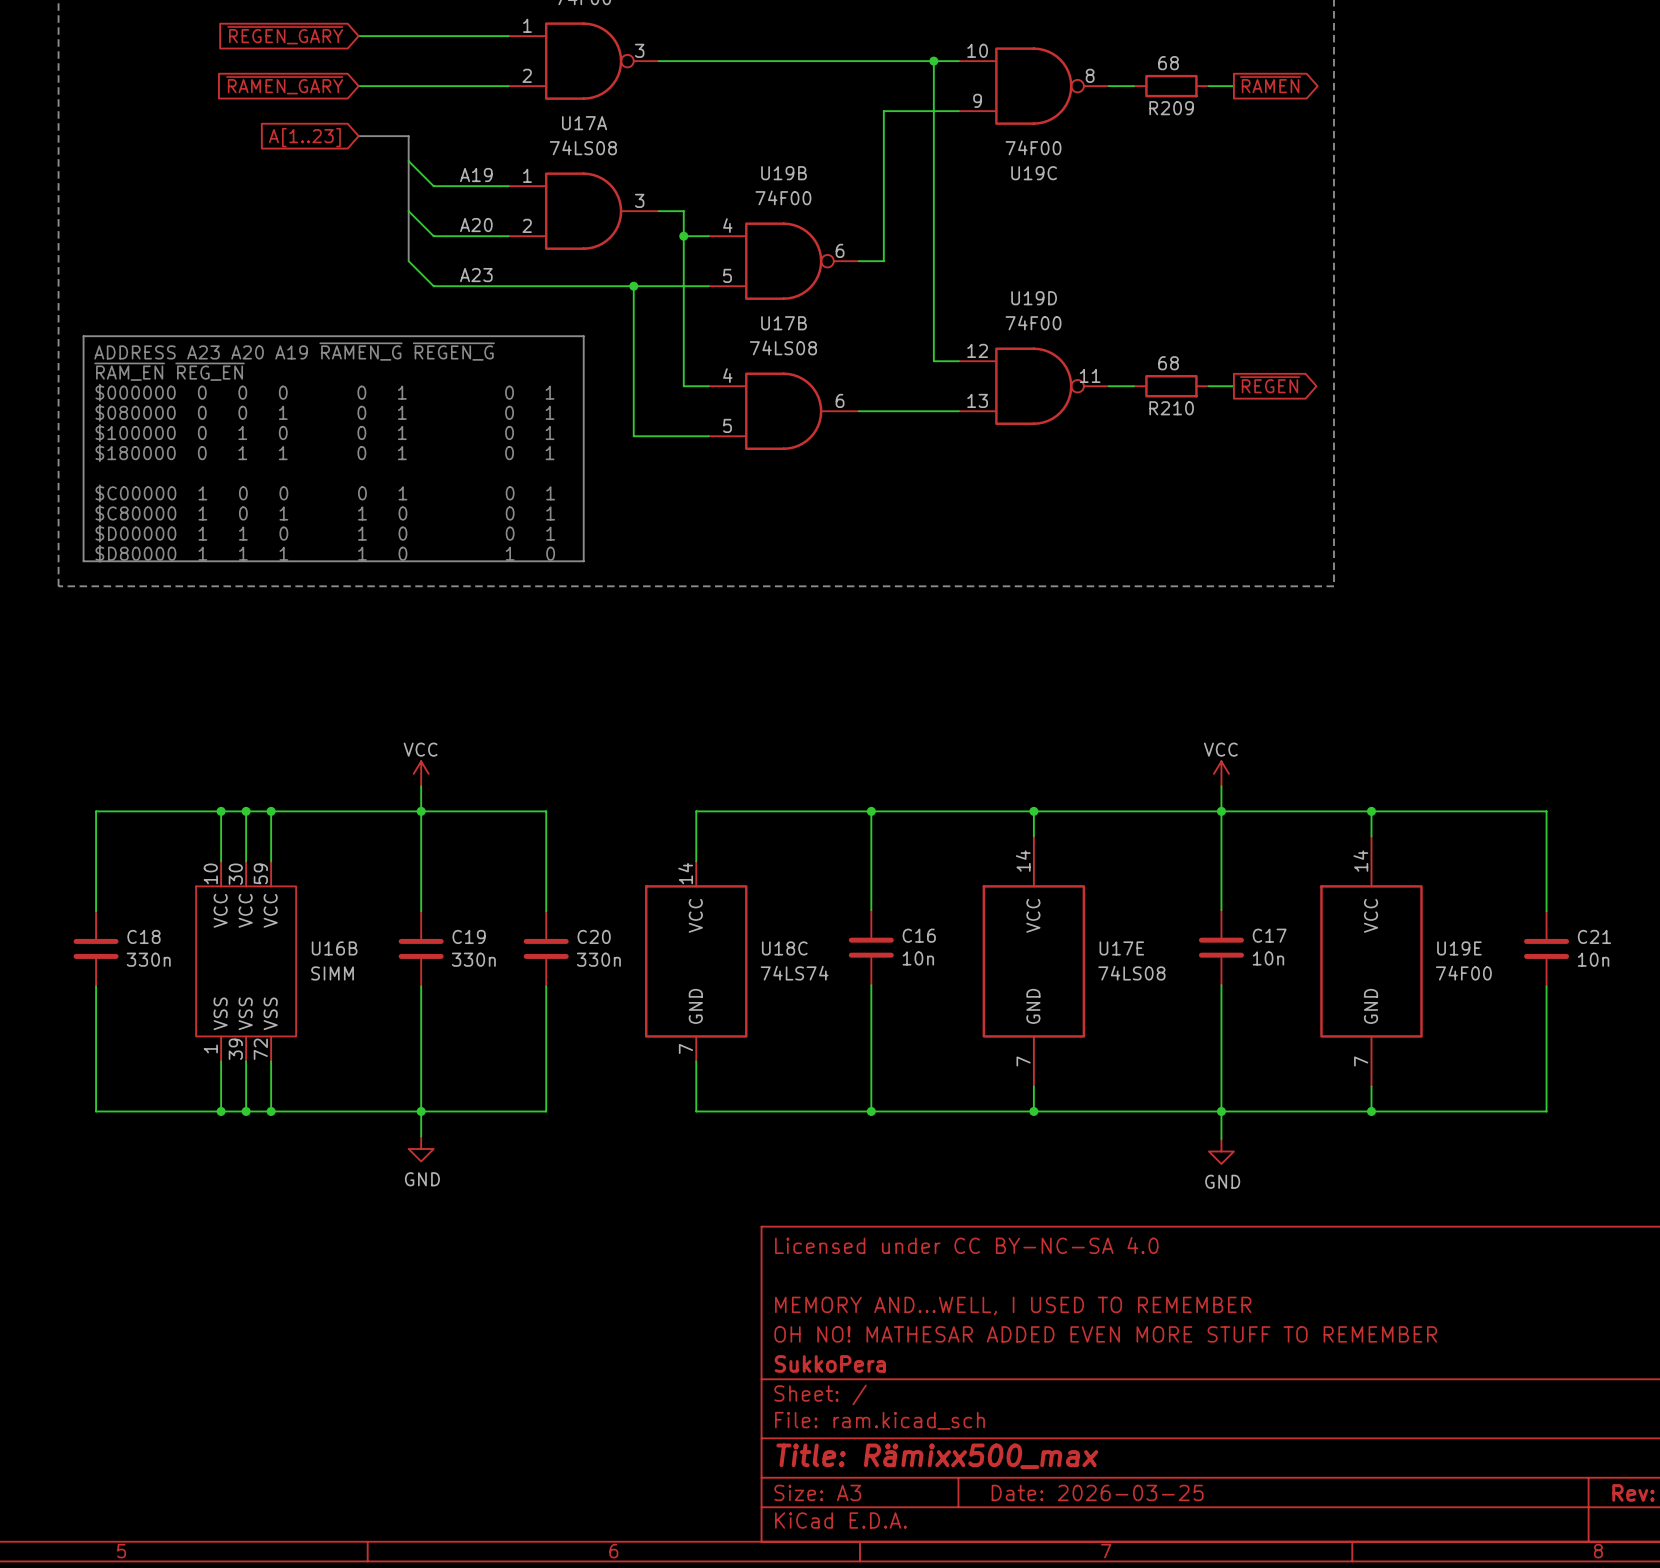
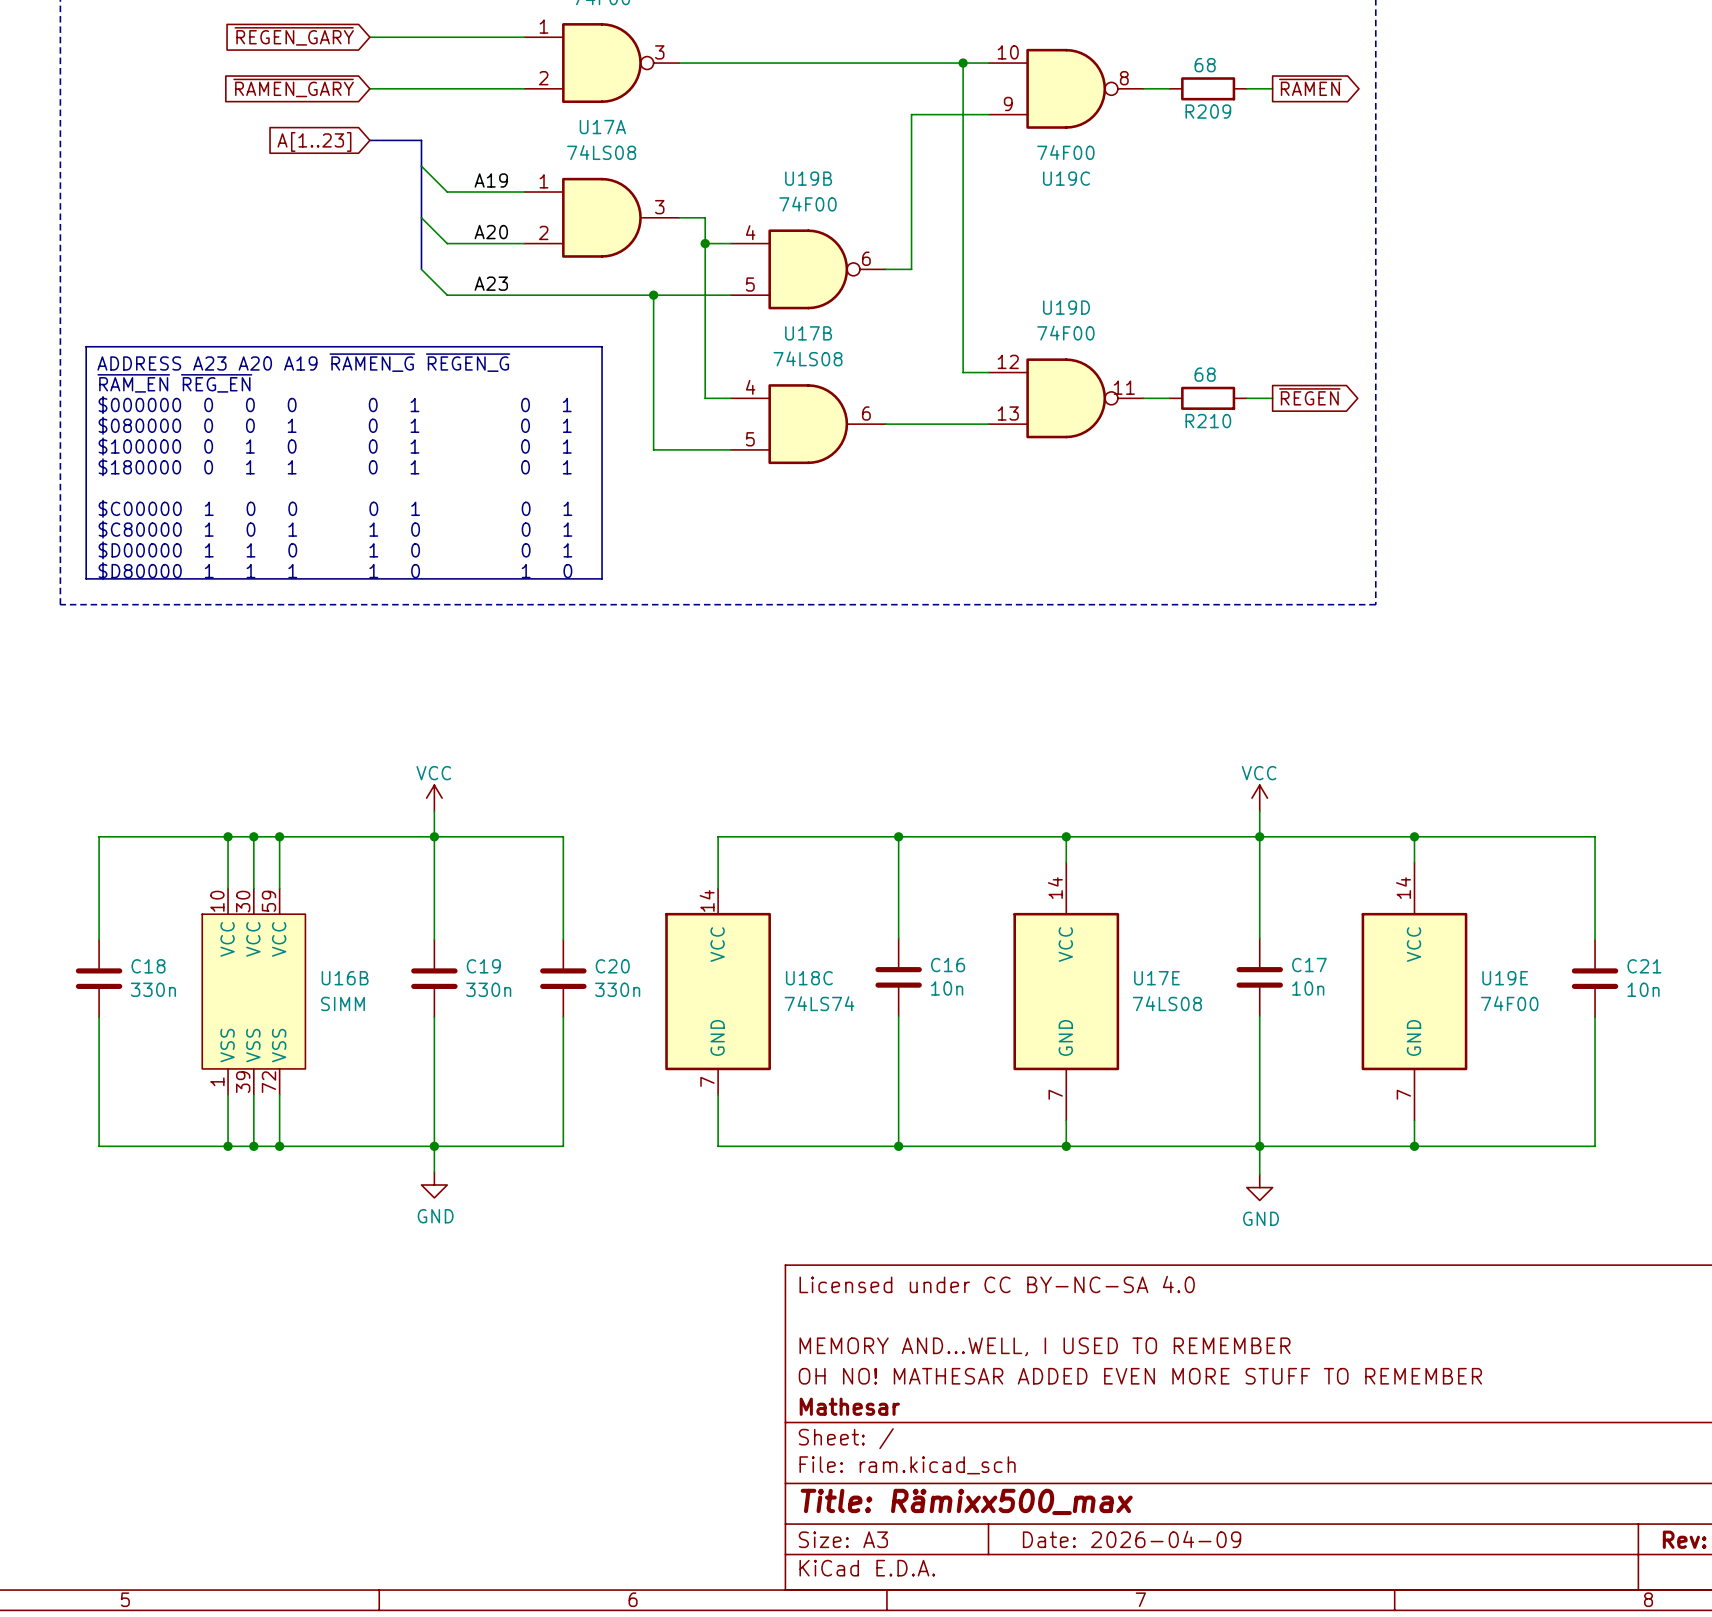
title block: SukkoPera (830, 1363) -> Mathesar (849, 1406)
title block: Date: 2026-03-25 (1097, 1492) -> Date: 2026-04-09 (1132, 1539)

